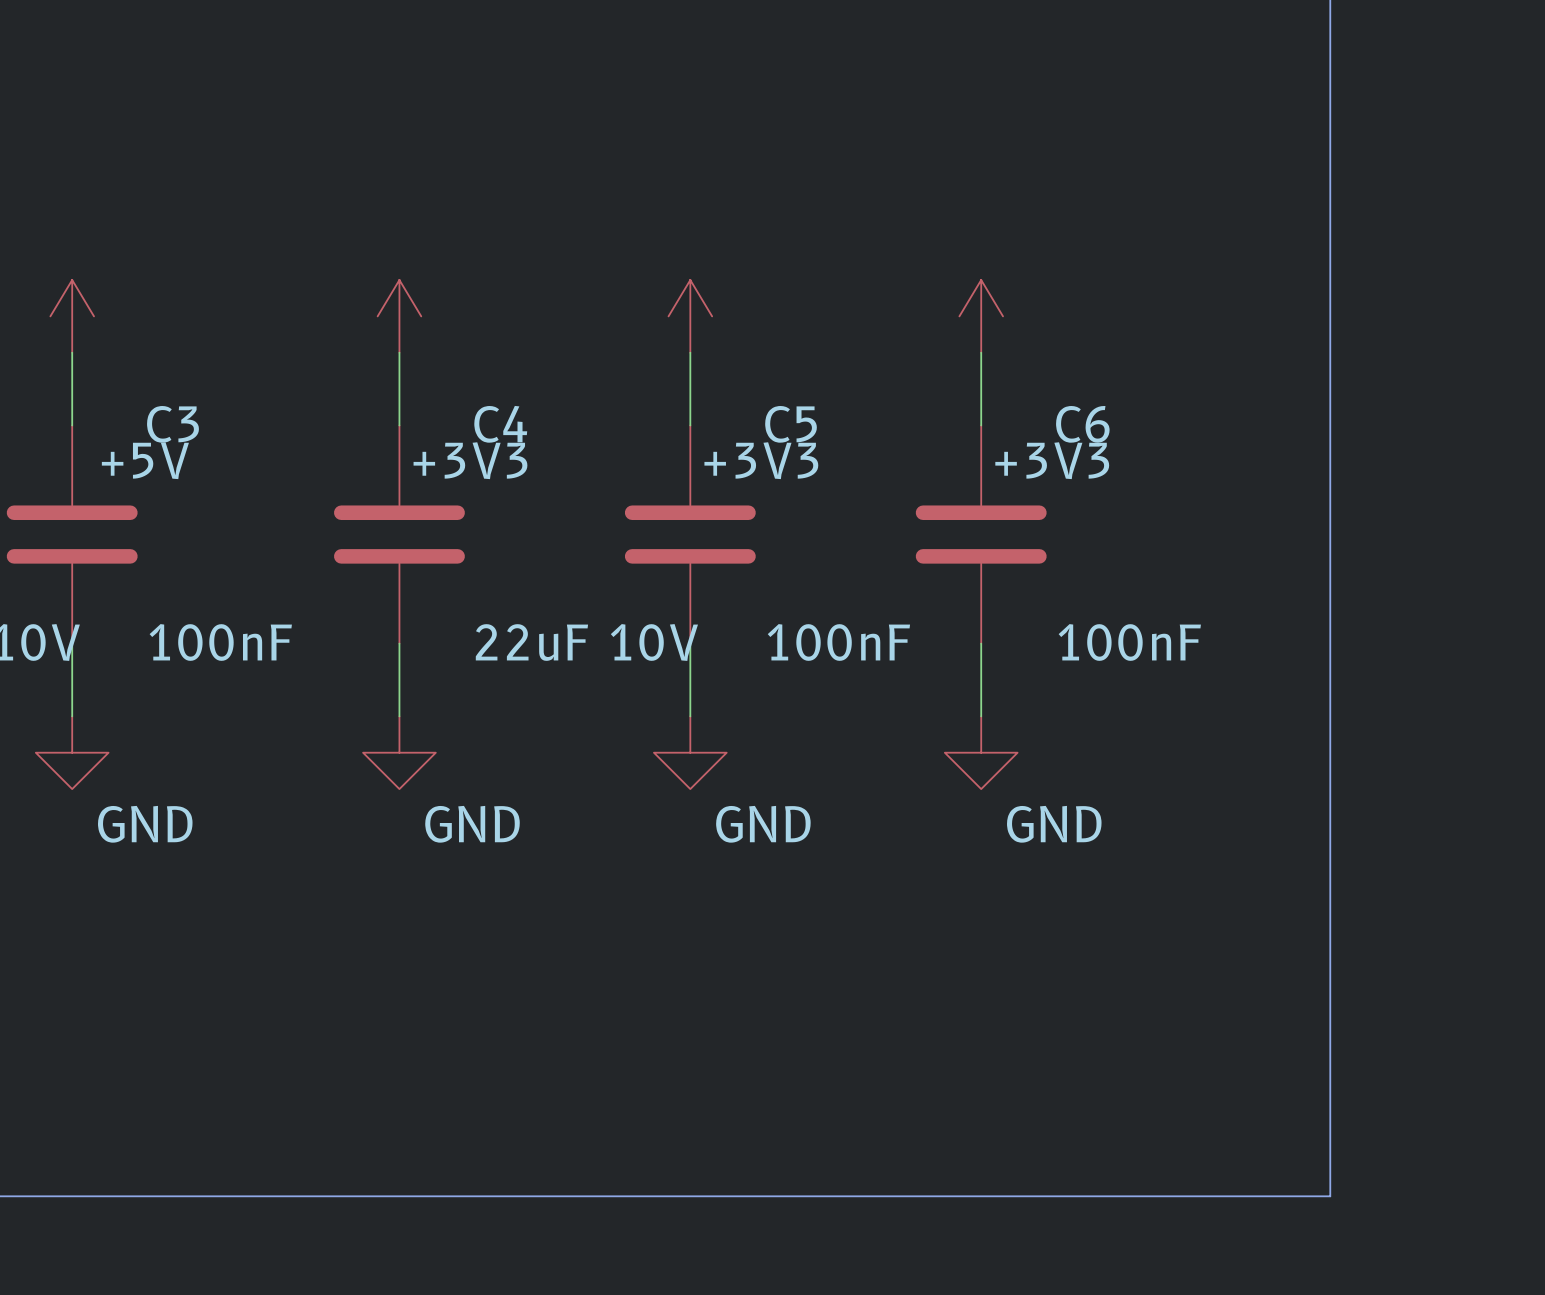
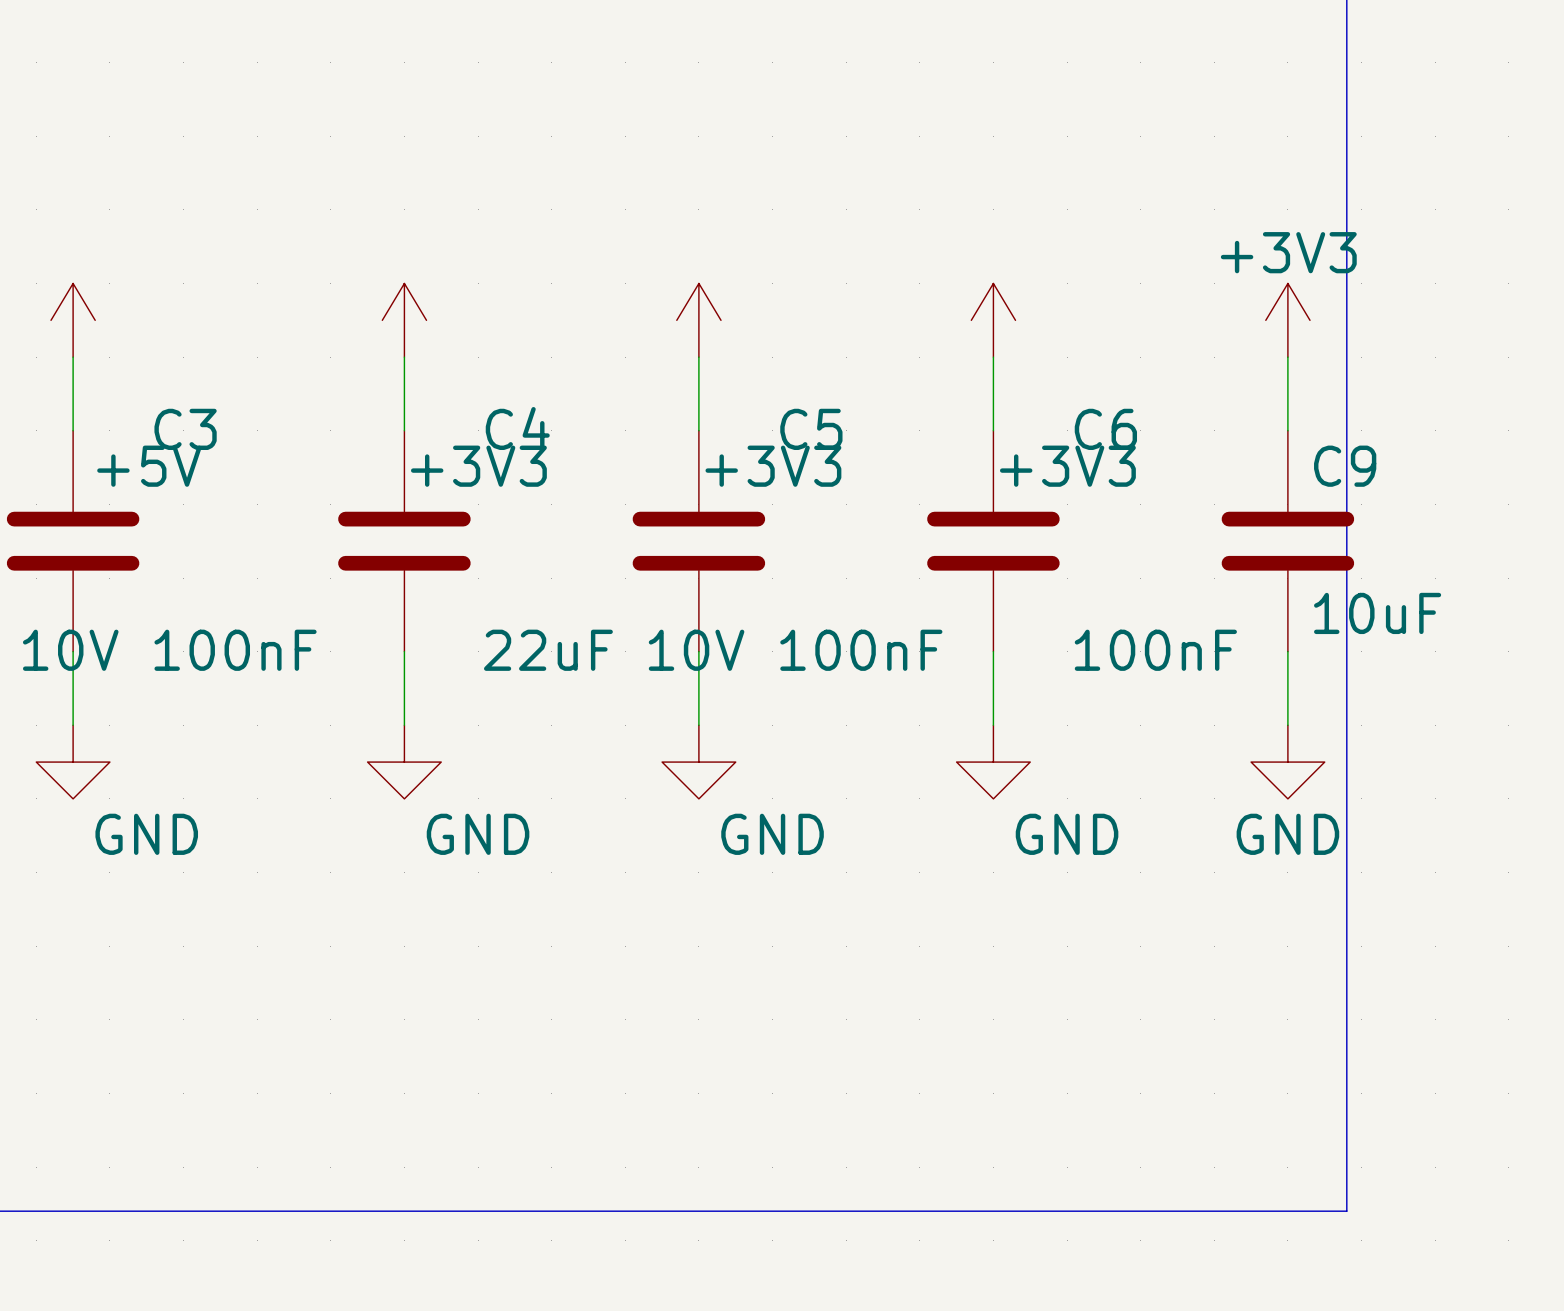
power symbol: none -> +3V3 (1287, 320)
wire: none -> (1287, 357) (1287, 430)
C9: none -> 10uF (1287, 541)
wire: none -> (1287, 651) (1287, 725)
power symbol: none -> GND (1287, 762)

